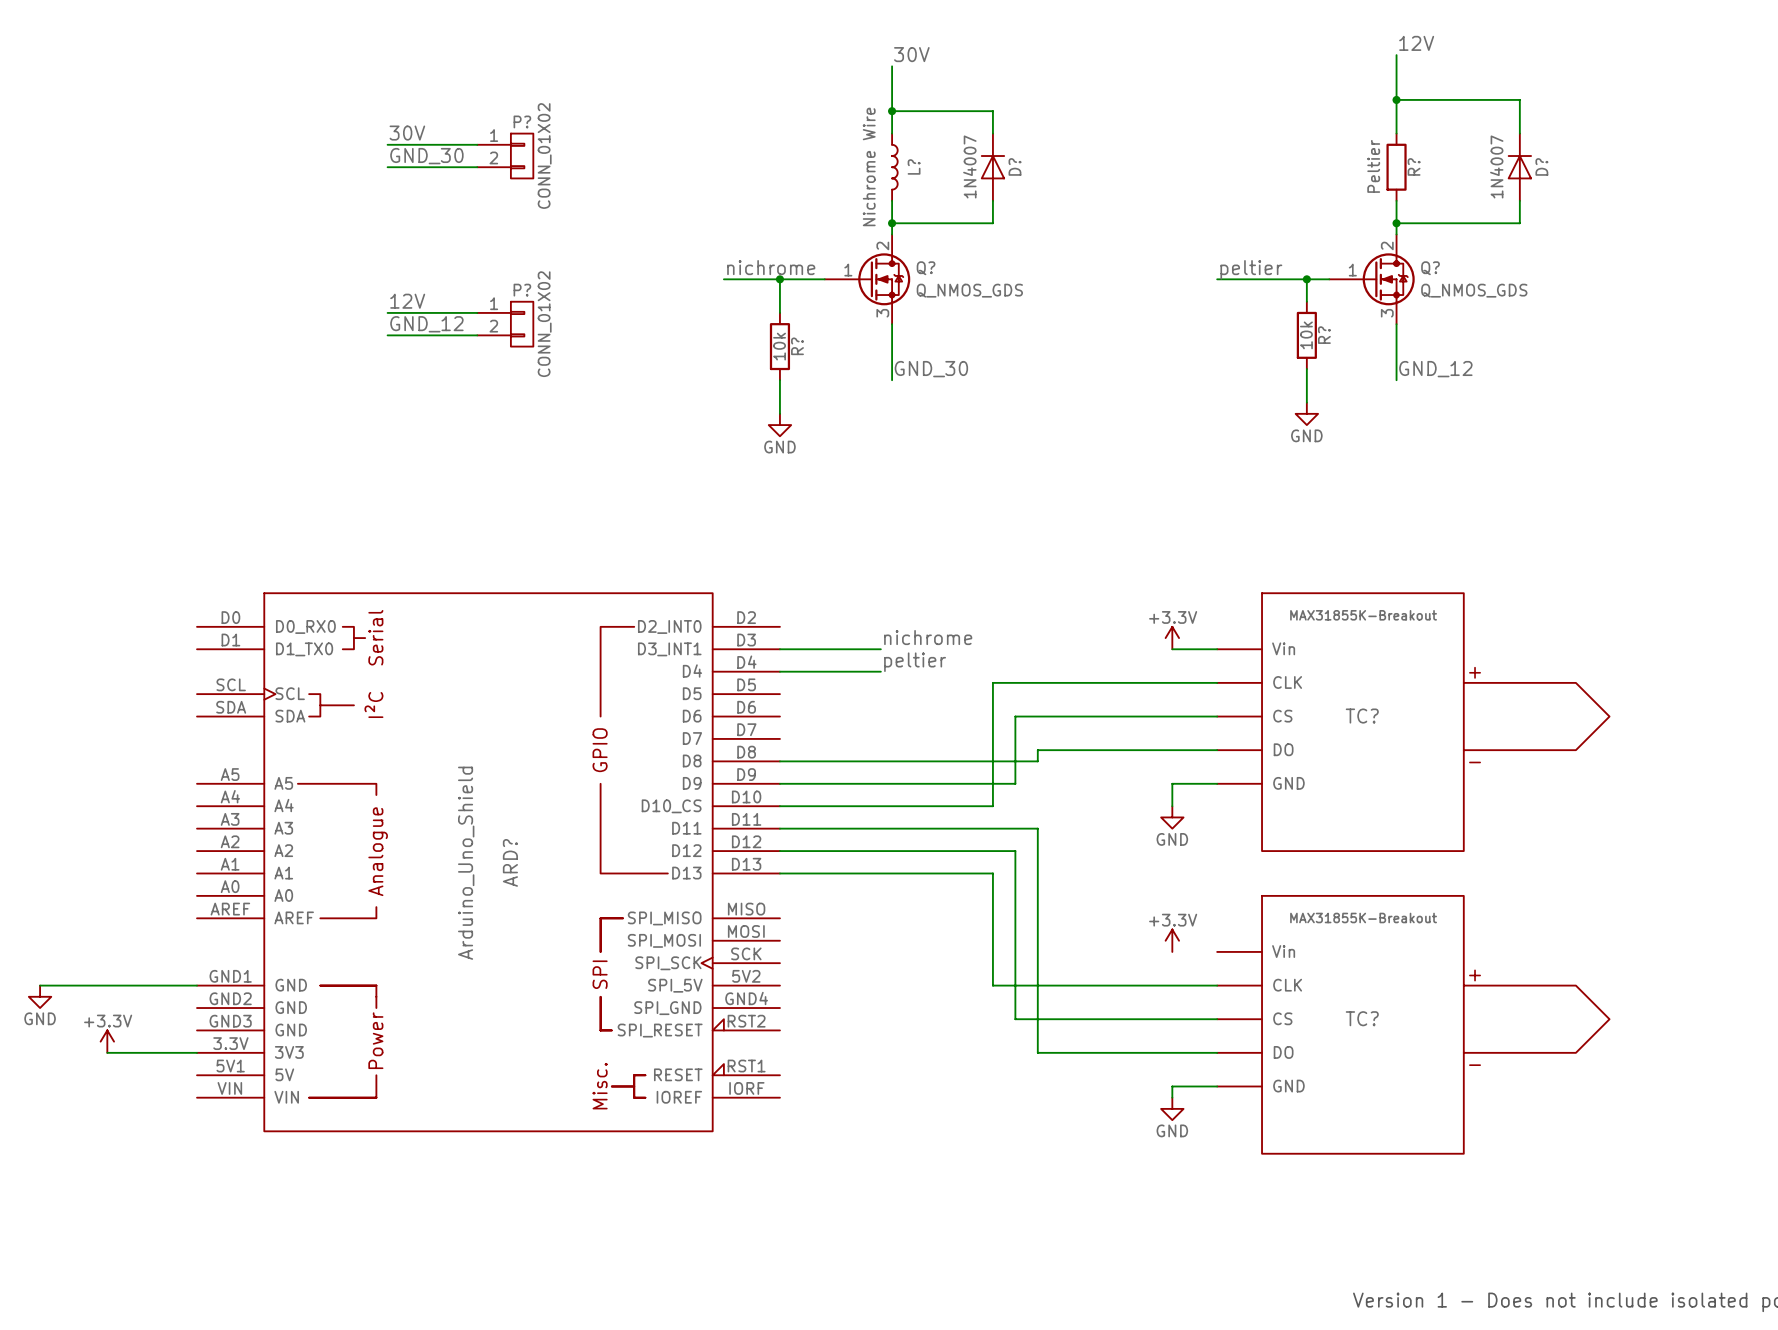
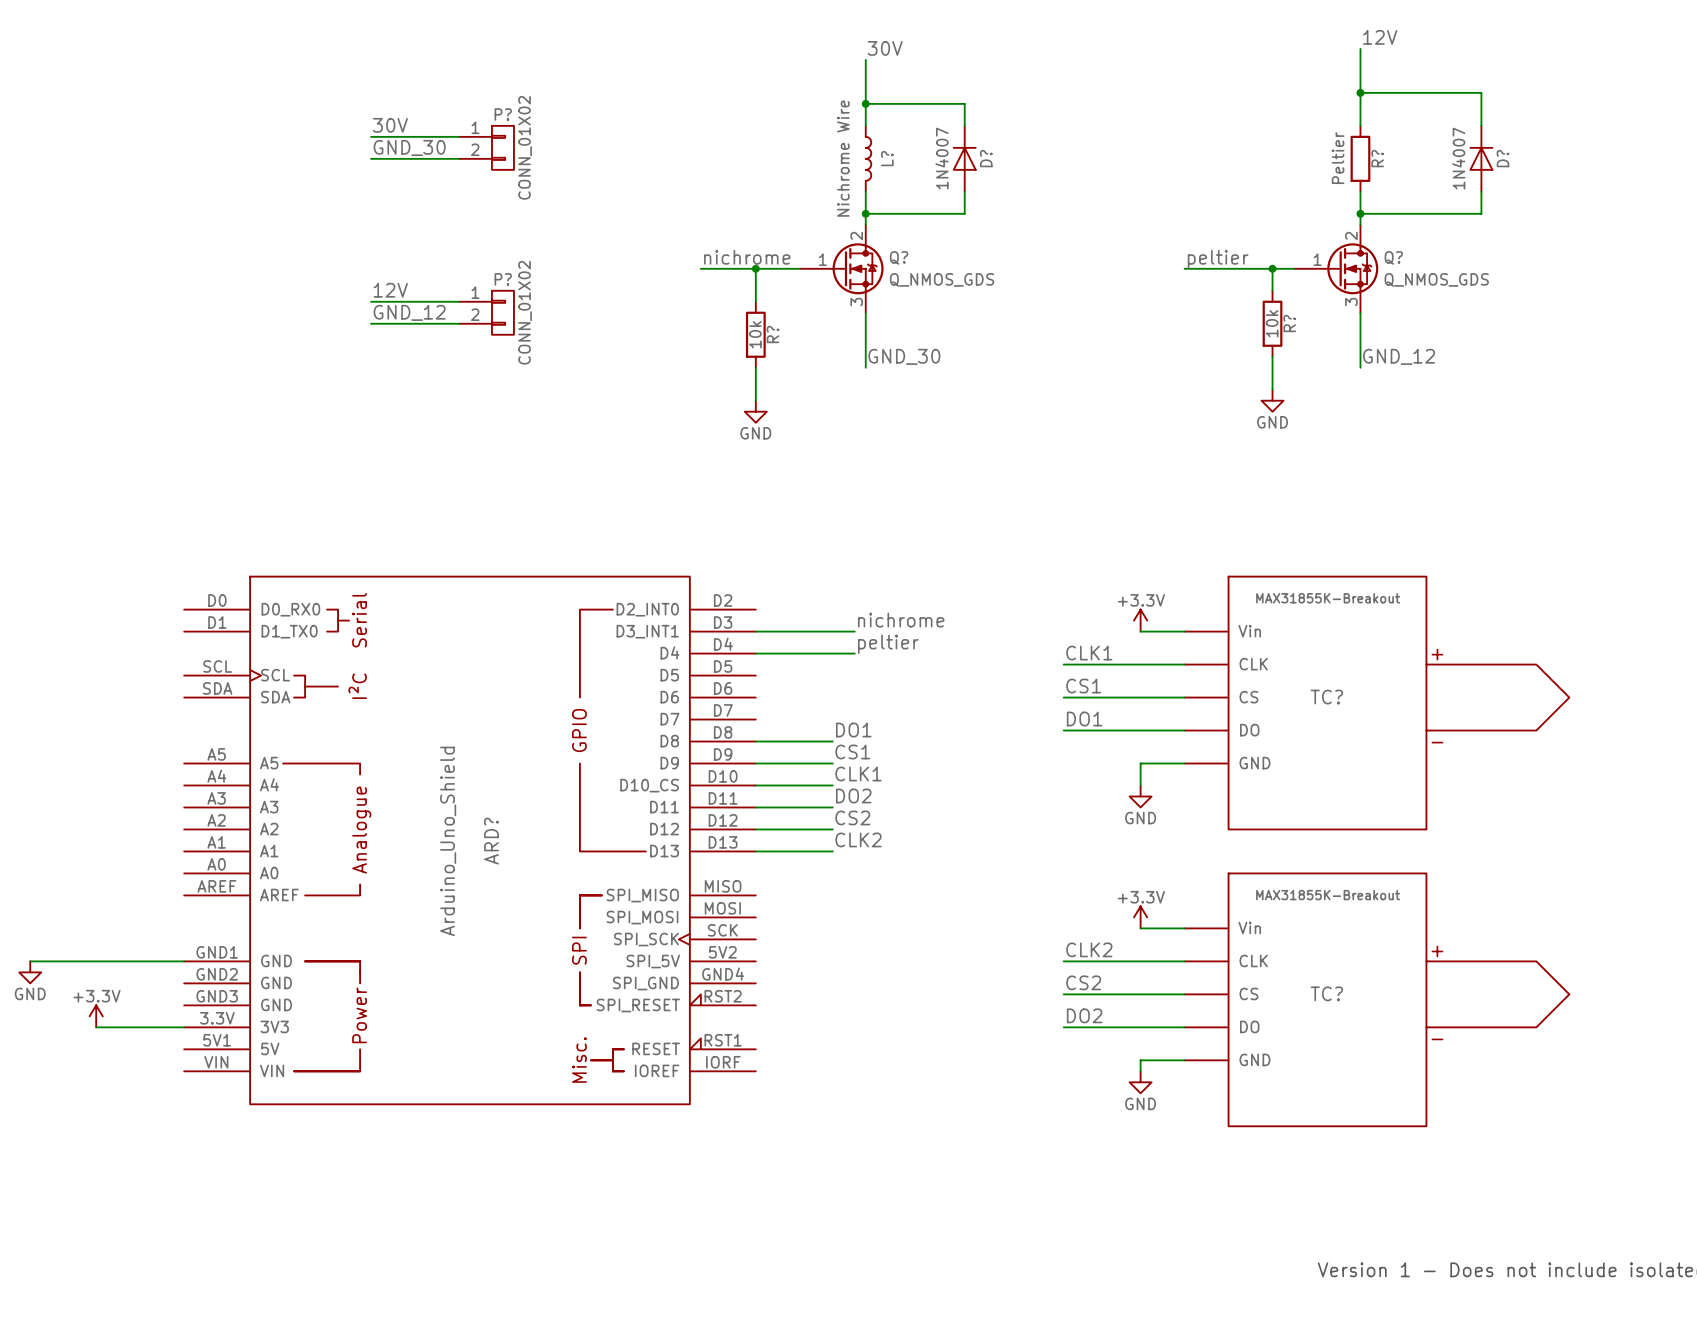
label: none -> CLK1 (1089, 653)
wire: (1093, 682) (992, 682) (992, 806) (858, 806) -> none
label: none -> CS1 (1083, 686)
wire: (1093, 716) (1015, 716) (1015, 783) (858, 783) -> none
label: none -> DO1 (1084, 719)
label: none -> DO1 (853, 730)
wire: (1093, 750) (1037, 750) (1037, 761) (858, 761) -> none
label: none -> CS1 (852, 752)
label: none -> CLK1 (858, 773)
label: none -> DO2 (853, 795)
wire: (858, 828) (1037, 828) (1037, 1052) (1093, 1052) -> none
label: none -> CS2 (852, 817)
wire: (858, 851) (1015, 851) (1015, 1019) (1093, 1019) -> none
label: none -> CLK2 (858, 839)
wire: (858, 873) (992, 873) (992, 985) (1093, 985) -> none
wire: none -> (1140, 928) (1184, 928)
label: none -> CLK2 (1089, 949)
label: none -> CS2 (1083, 982)
label: none -> DO2 (1084, 1015)

